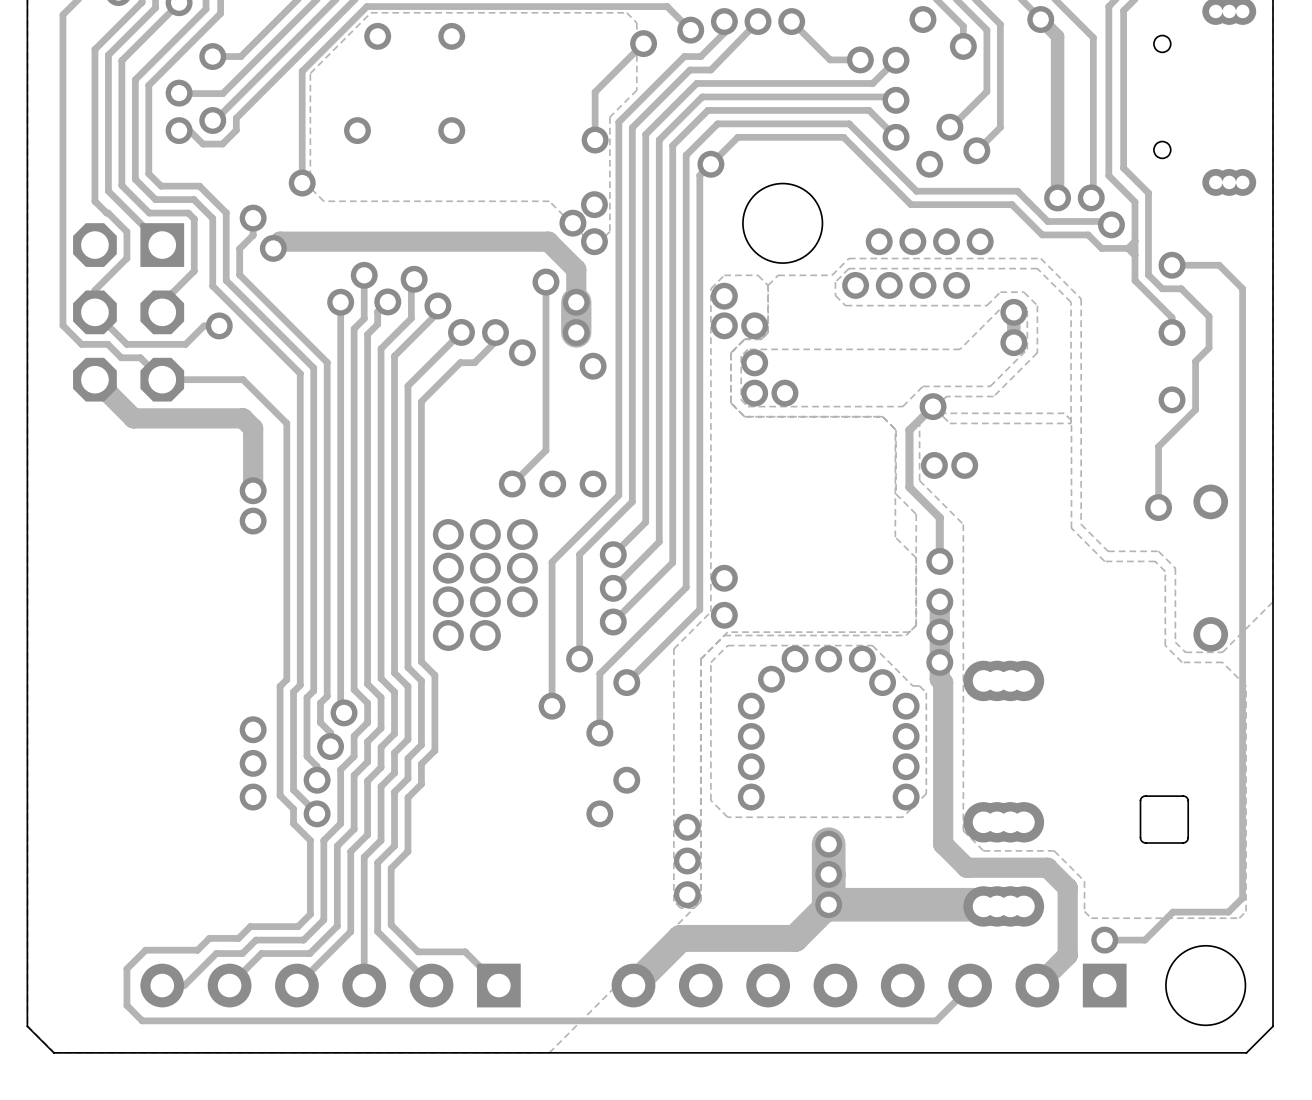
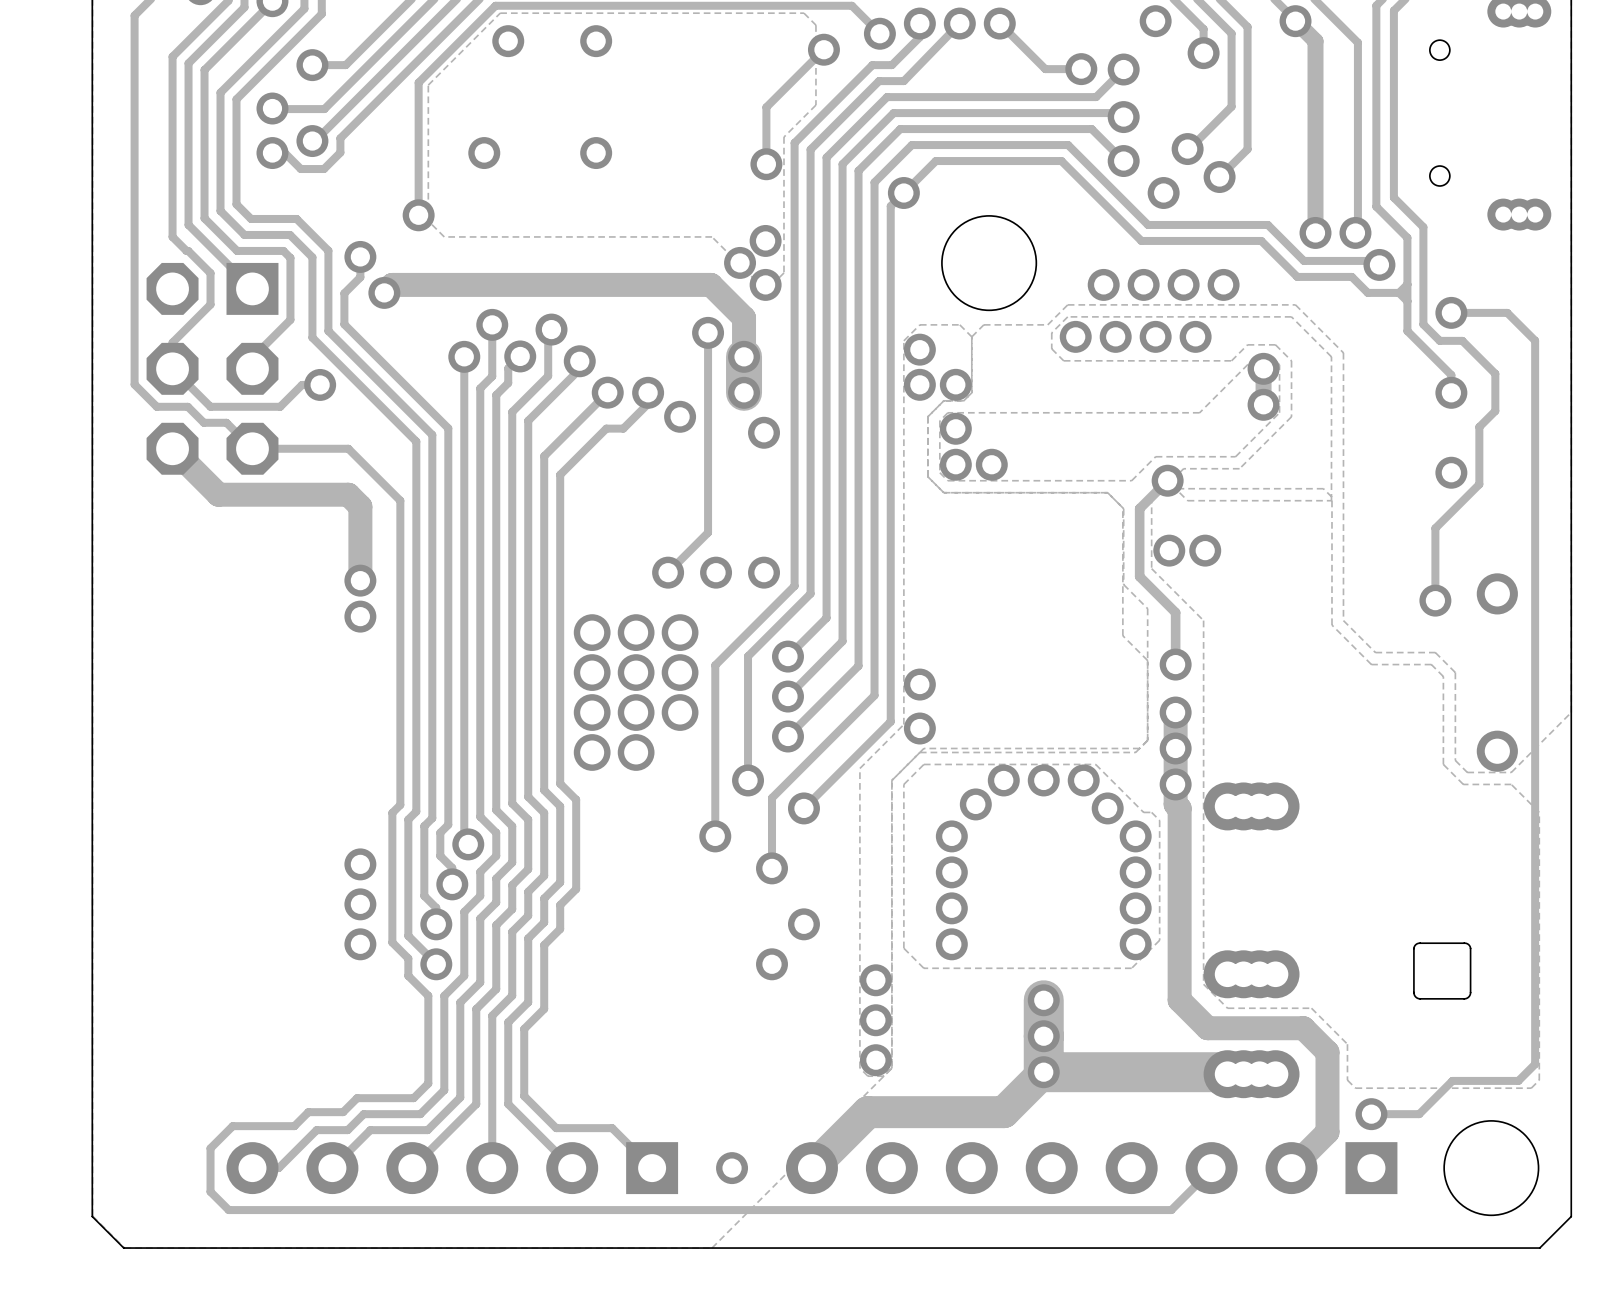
via: none -> (732, 1168)

